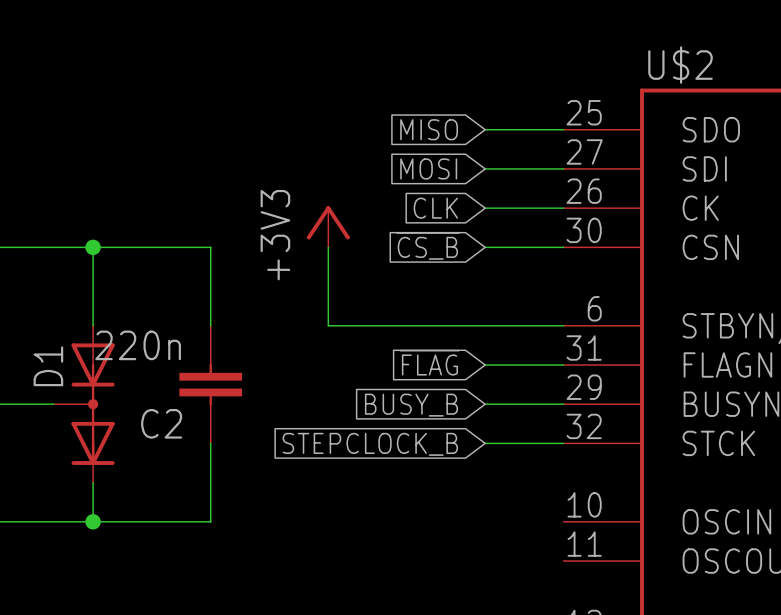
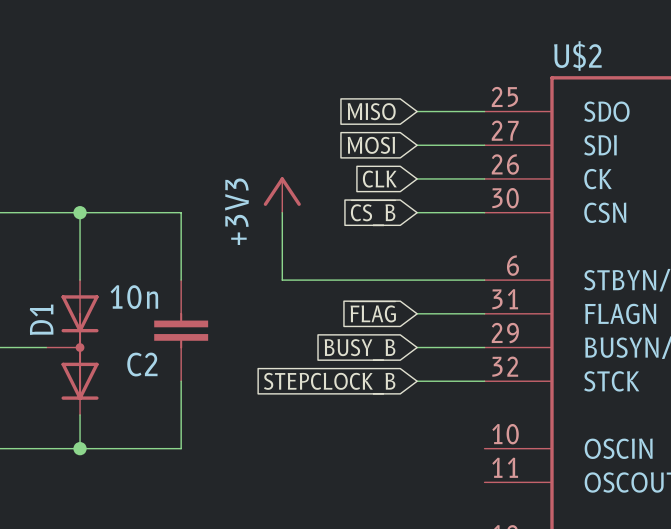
C2 value: 220n (138, 345) -> 10n (134, 297)

